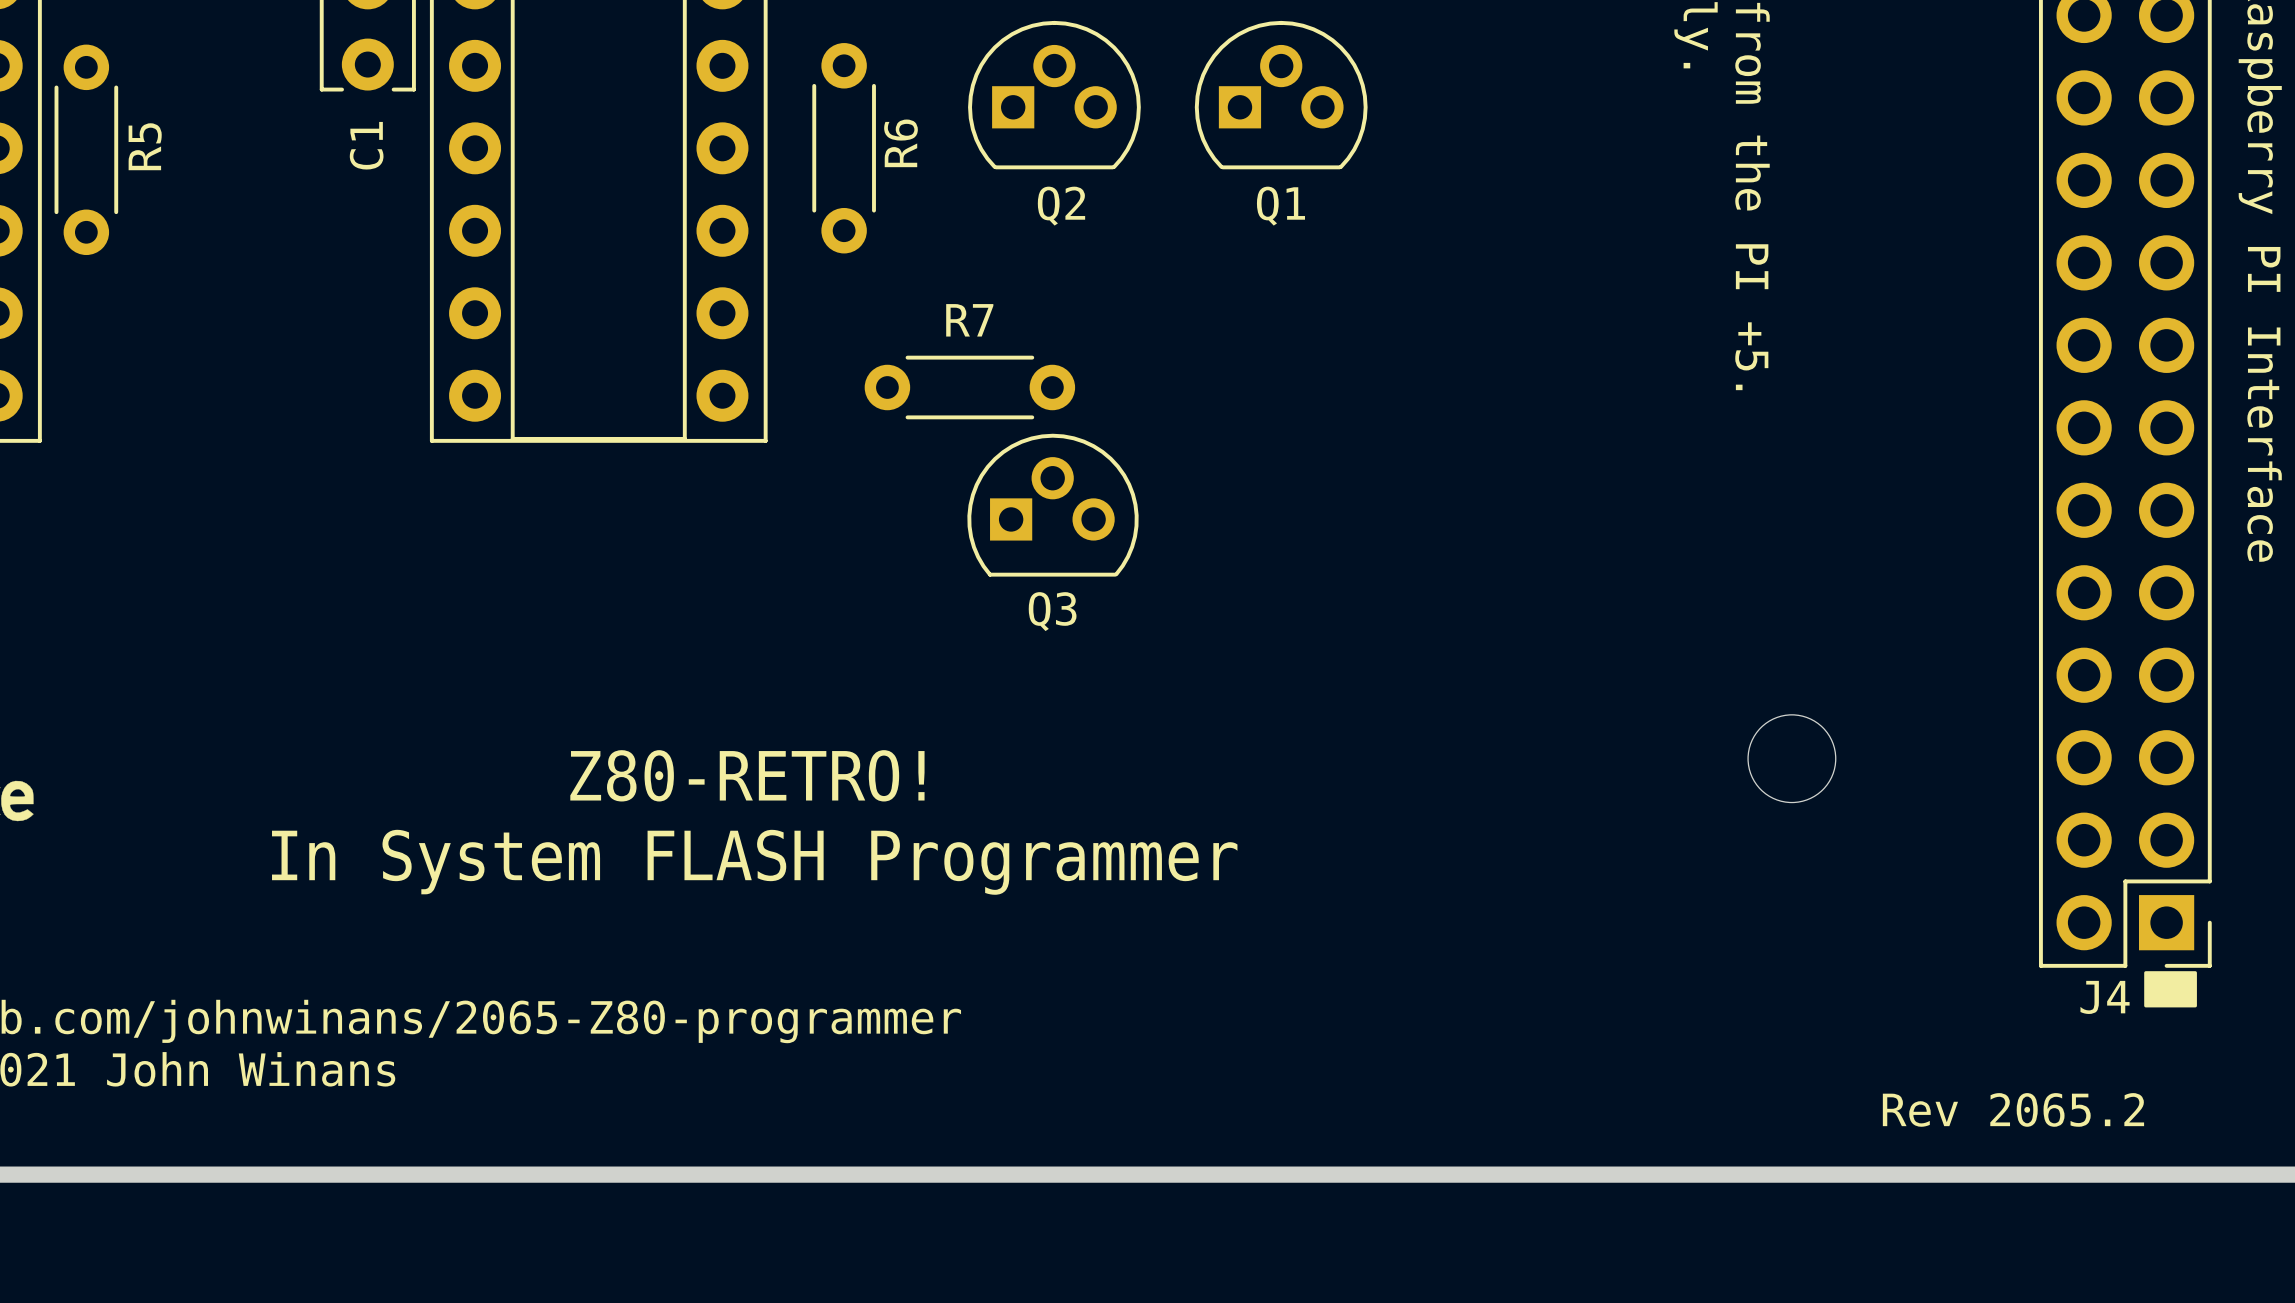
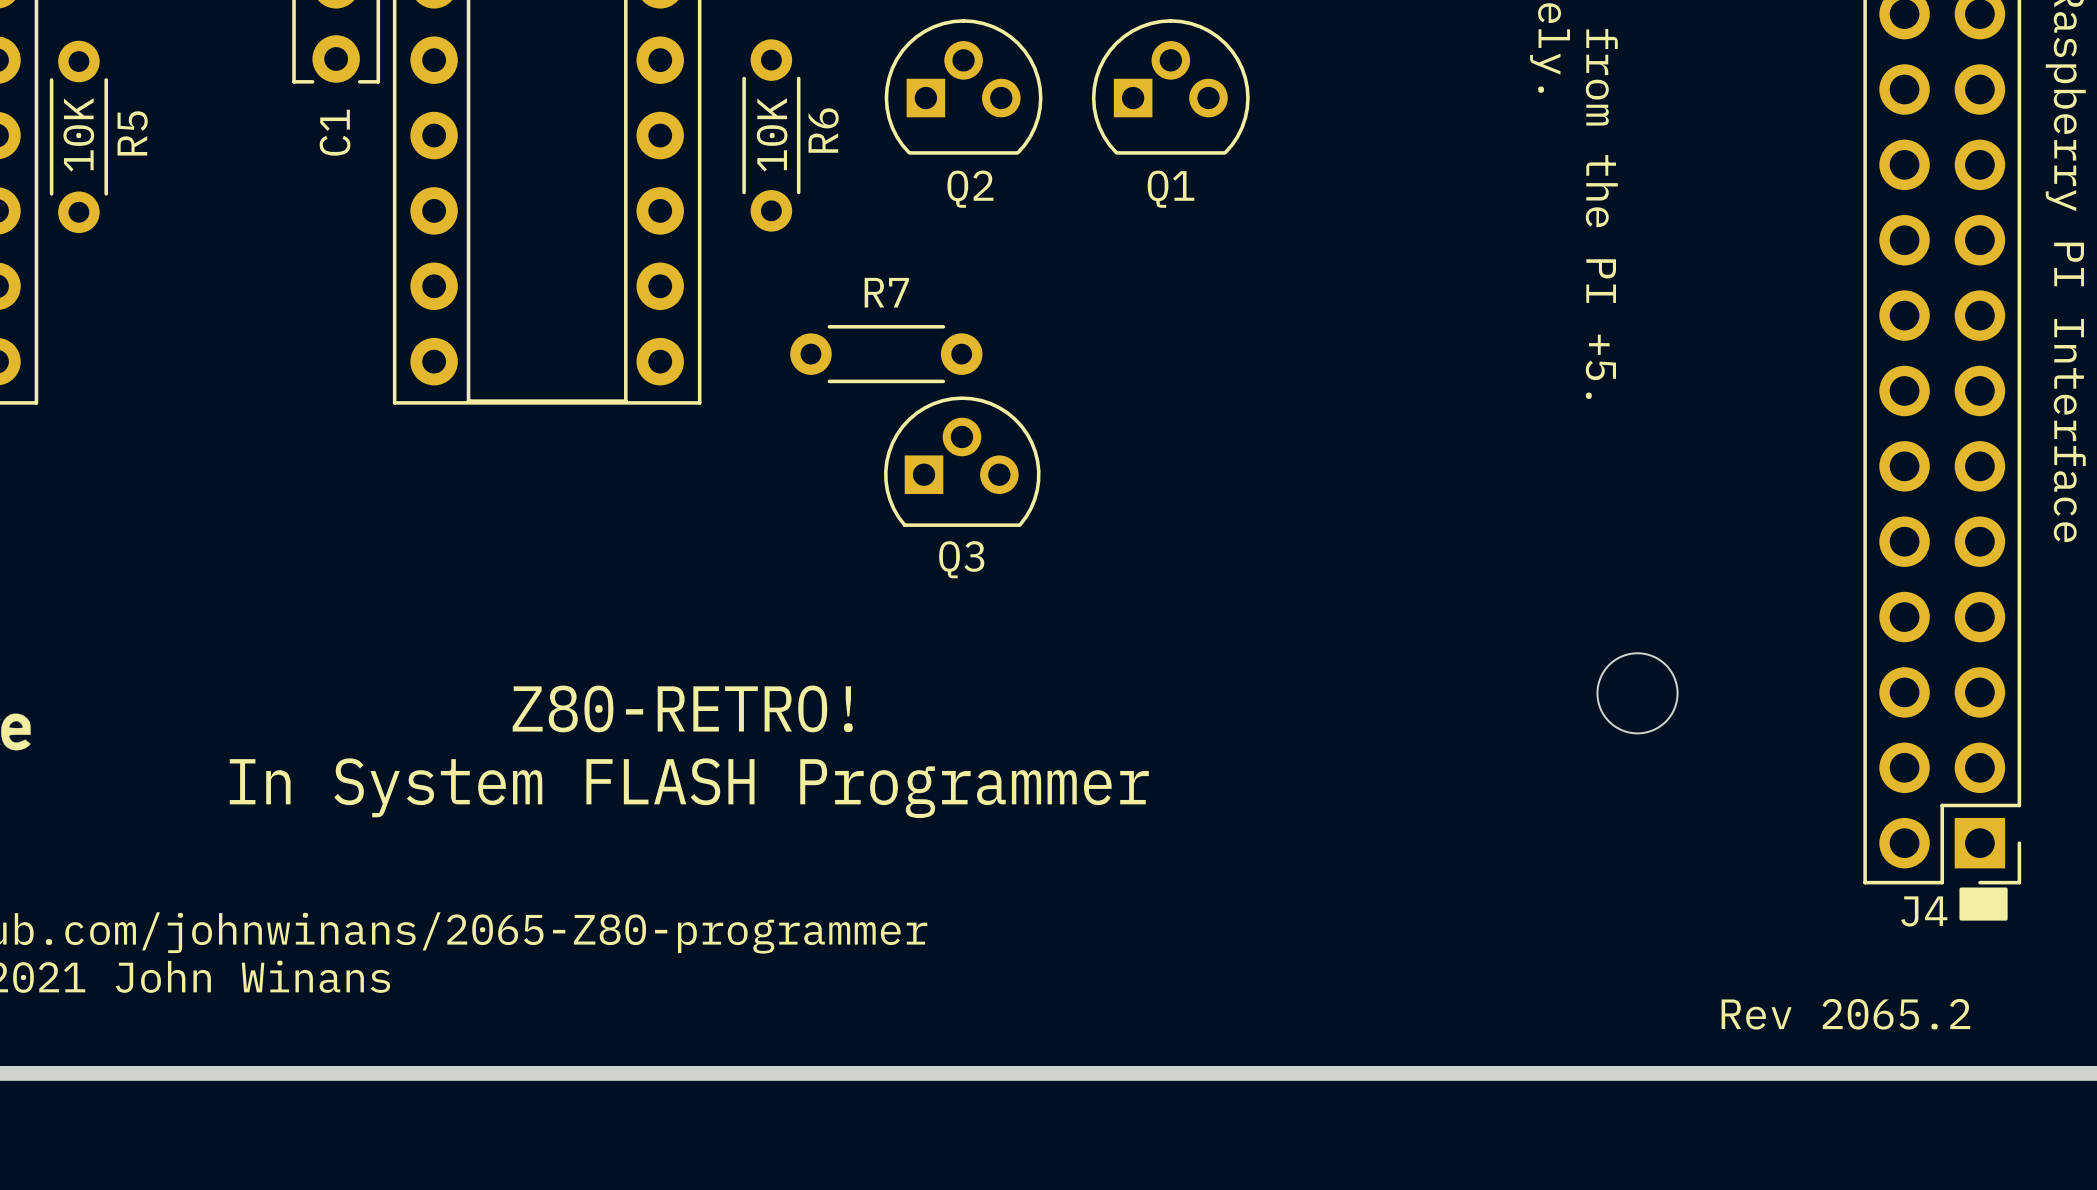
text: none -> 10K (78, 134)
text: none -> 10K (772, 134)

